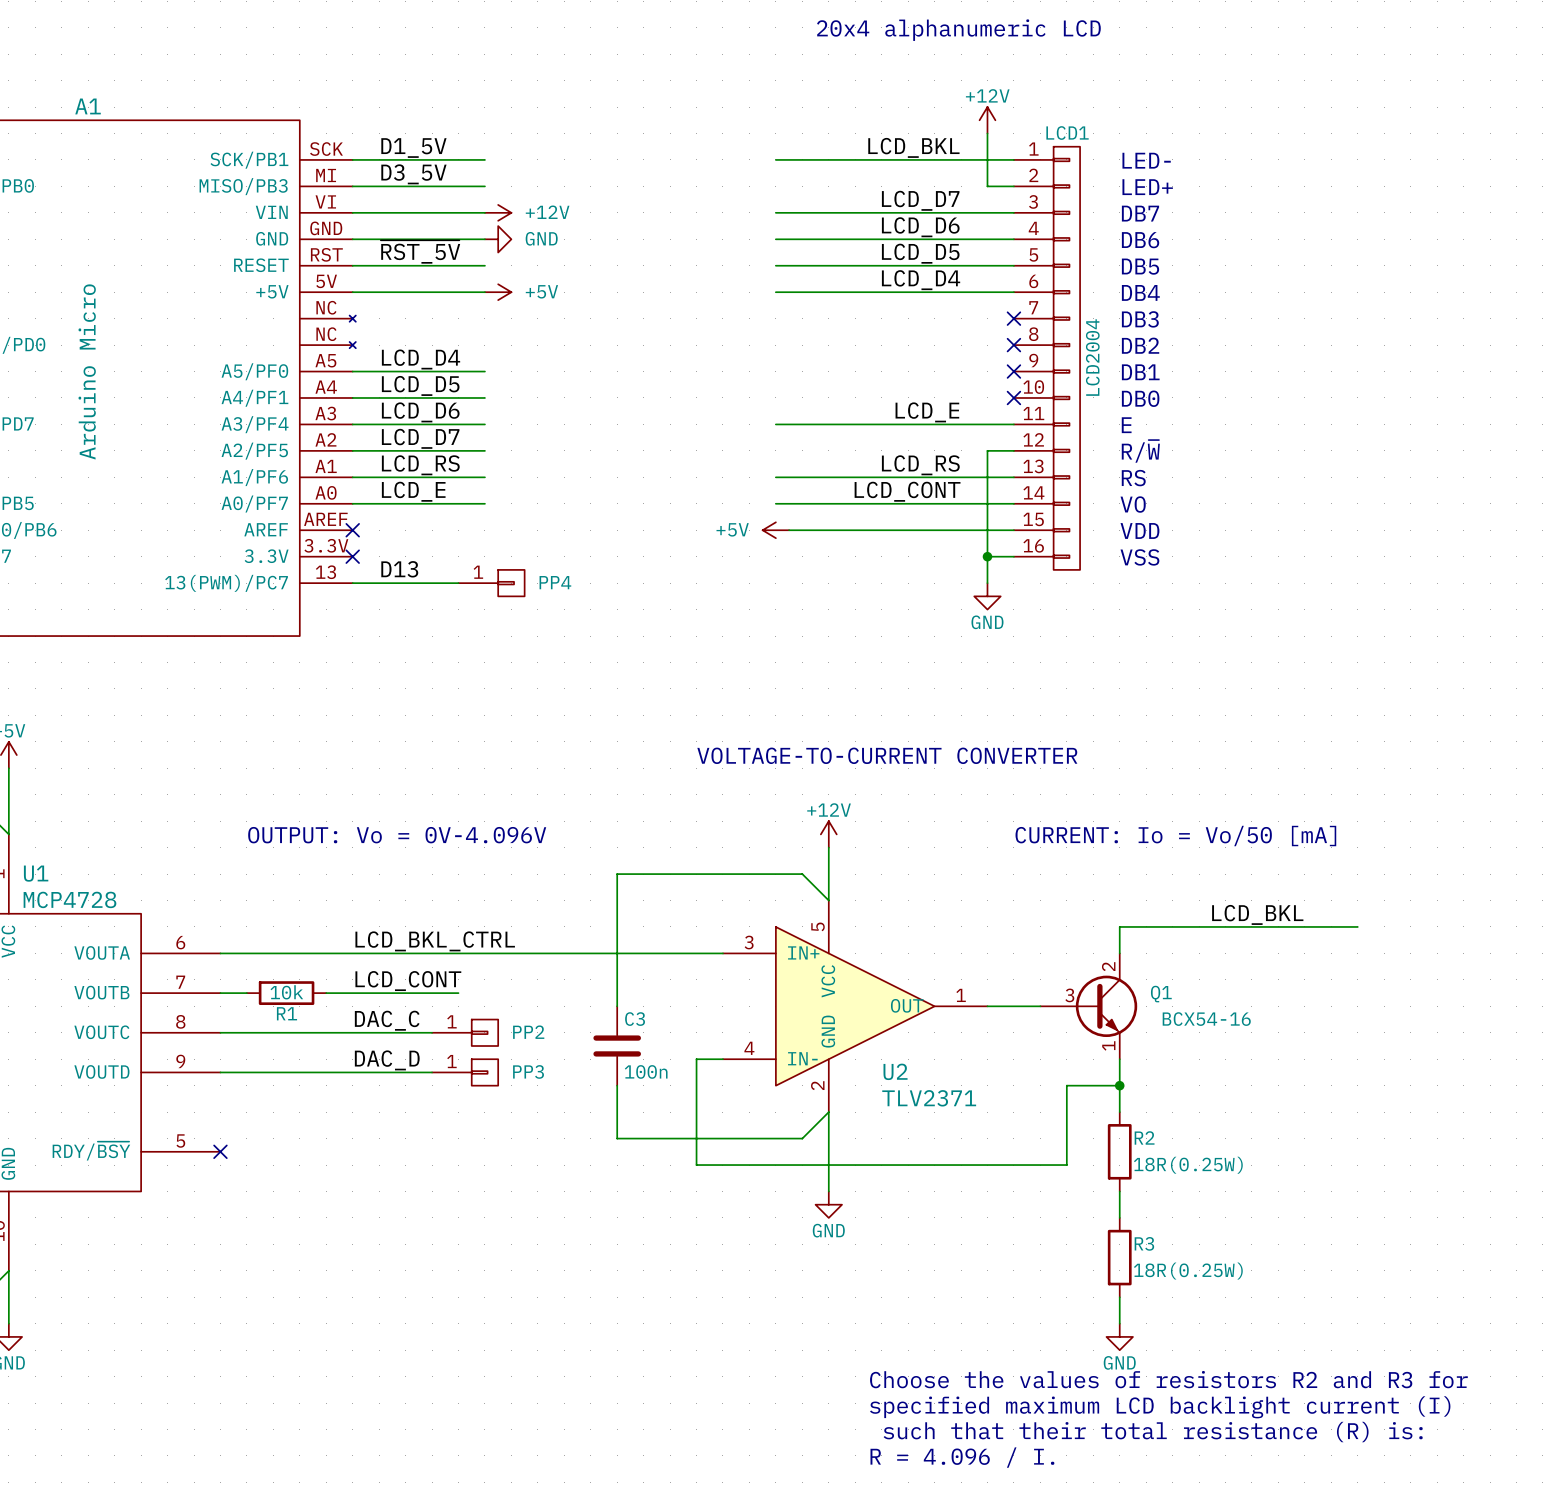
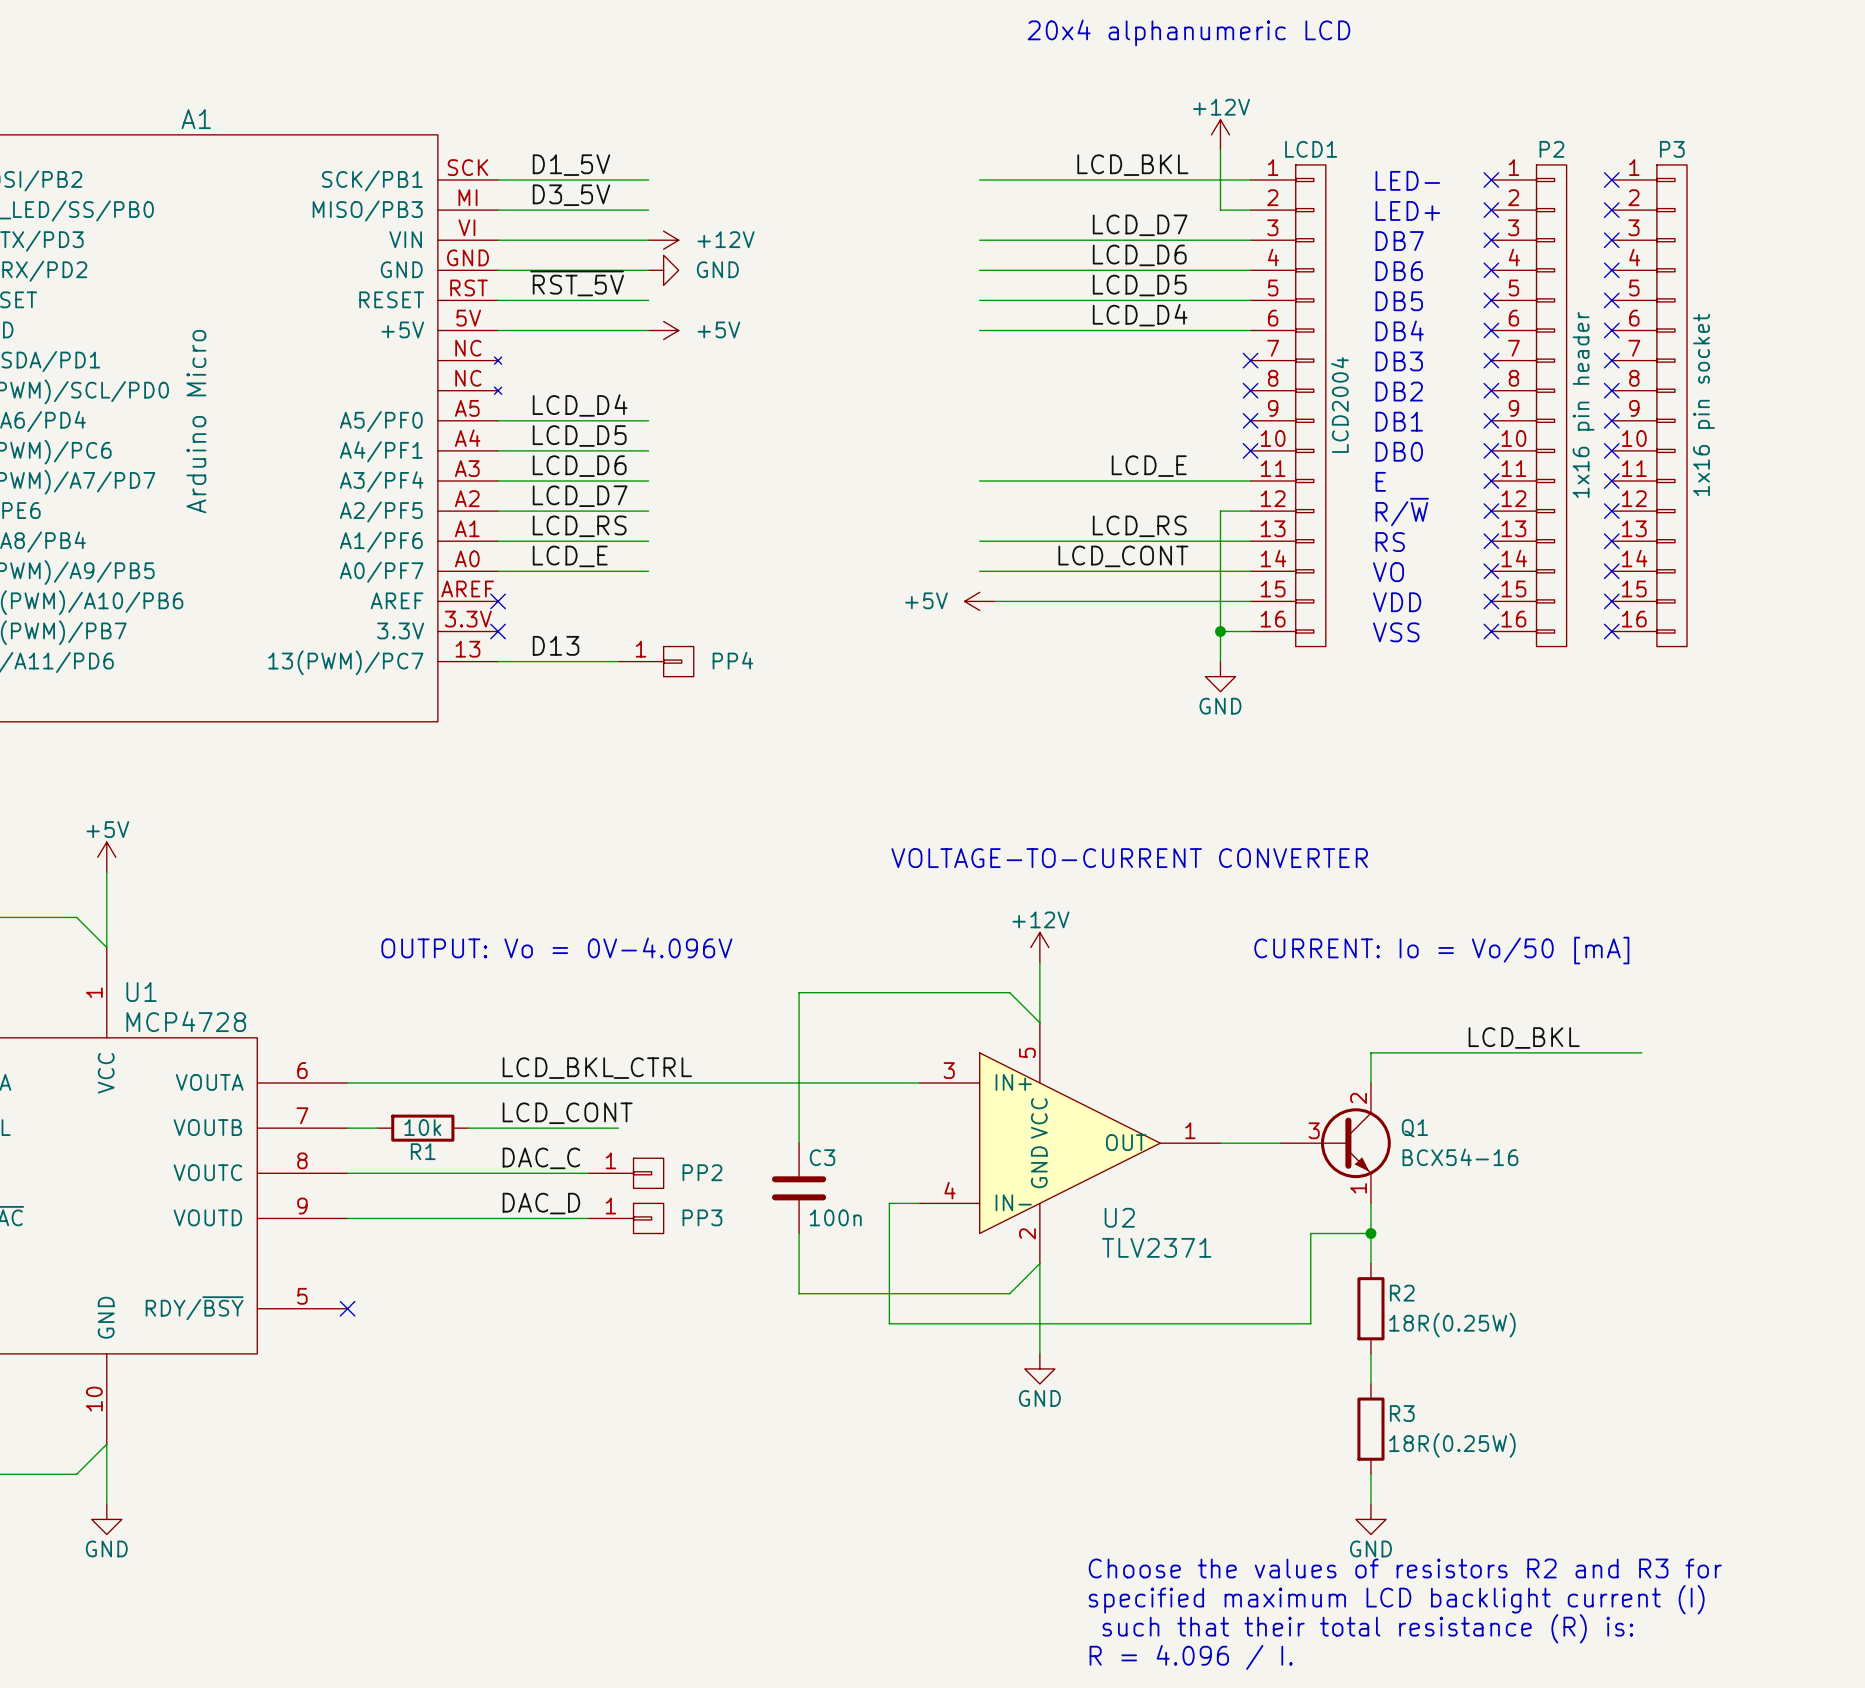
no-connect mark: none -> (1491, 180)
no-connect mark: none -> (1611, 180)
no-connect mark: none -> (1491, 210)
no-connect mark: none -> (1611, 210)
no-connect mark: none -> (1491, 240)
no-connect mark: none -> (1611, 240)
no-connect mark: none -> (1491, 270)
no-connect mark: none -> (1611, 270)
no-connect mark: none -> (1491, 300)
no-connect mark: none -> (1611, 300)
no-connect mark: none -> (1491, 330)
no-connect mark: none -> (1611, 330)
no-connect mark: none -> (1491, 360)
no-connect mark: none -> (1611, 360)
no-connect mark: none -> (1491, 390)
no-connect mark: none -> (1611, 390)
P2: none -> 1x16 pin header (1528, 405)
P3: none -> 1x16 pin socket (1649, 405)
no-connect mark: none -> (1491, 420)
no-connect mark: none -> (1611, 420)
no-connect mark: none -> (1491, 450)
no-connect mark: none -> (1611, 450)
no-connect mark: none -> (1491, 481)
no-connect mark: none -> (1611, 481)
no-connect mark: none -> (1491, 511)
no-connect mark: none -> (1611, 511)
no-connect mark: none -> (1491, 541)
no-connect mark: none -> (1611, 541)
no-connect mark: none -> (1491, 571)
no-connect mark: none -> (1611, 571)
no-connect mark: none -> (1491, 601)
no-connect mark: none -> (1611, 601)
no-connect mark: none -> (1491, 631)
no-connect mark: none -> (1611, 631)

